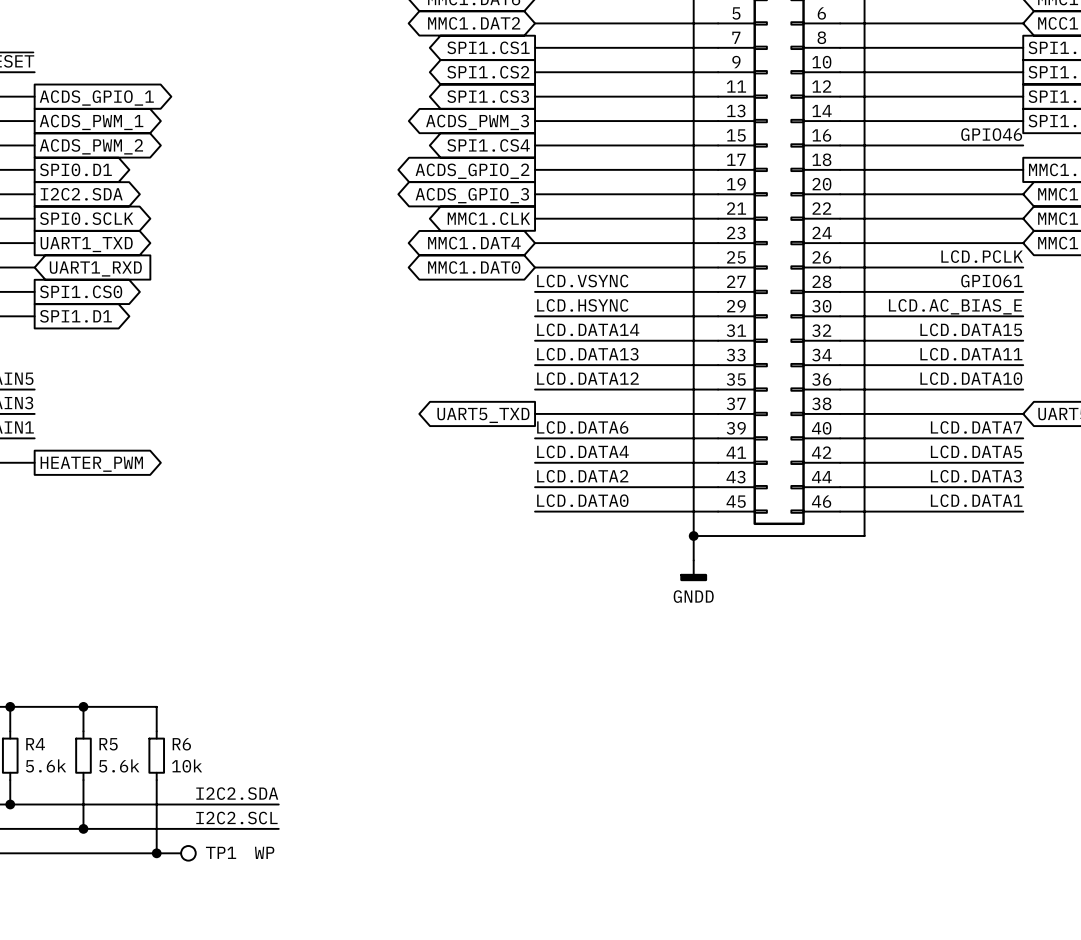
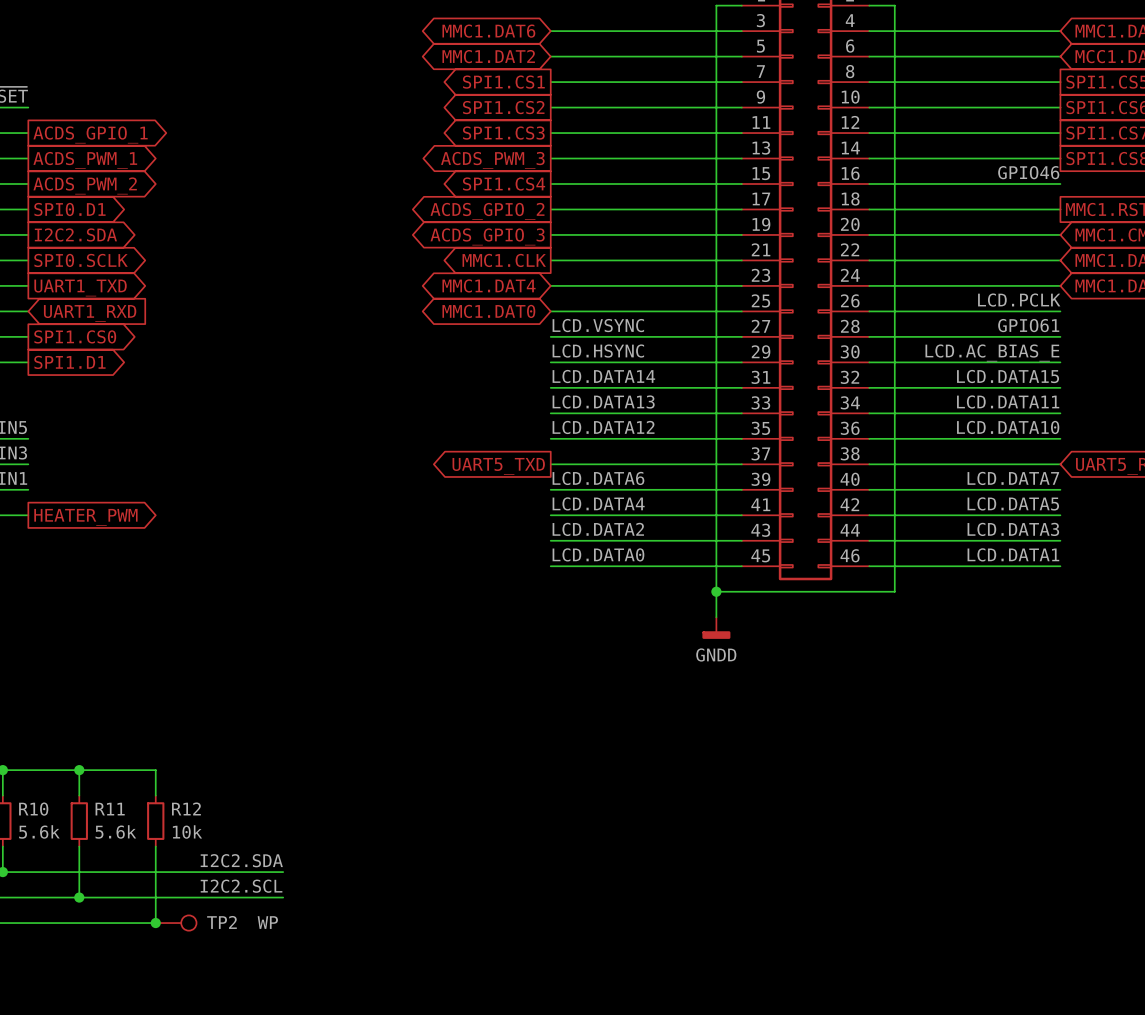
R4 name: R4 (35, 744) -> R10 (33, 809)
R5 name: R5 (108, 744) -> R11 (110, 809)
R6 name: R6 (181, 744) -> R12 (186, 808)
TP1 name: TP1 (221, 852) -> TP2 (221, 922)

